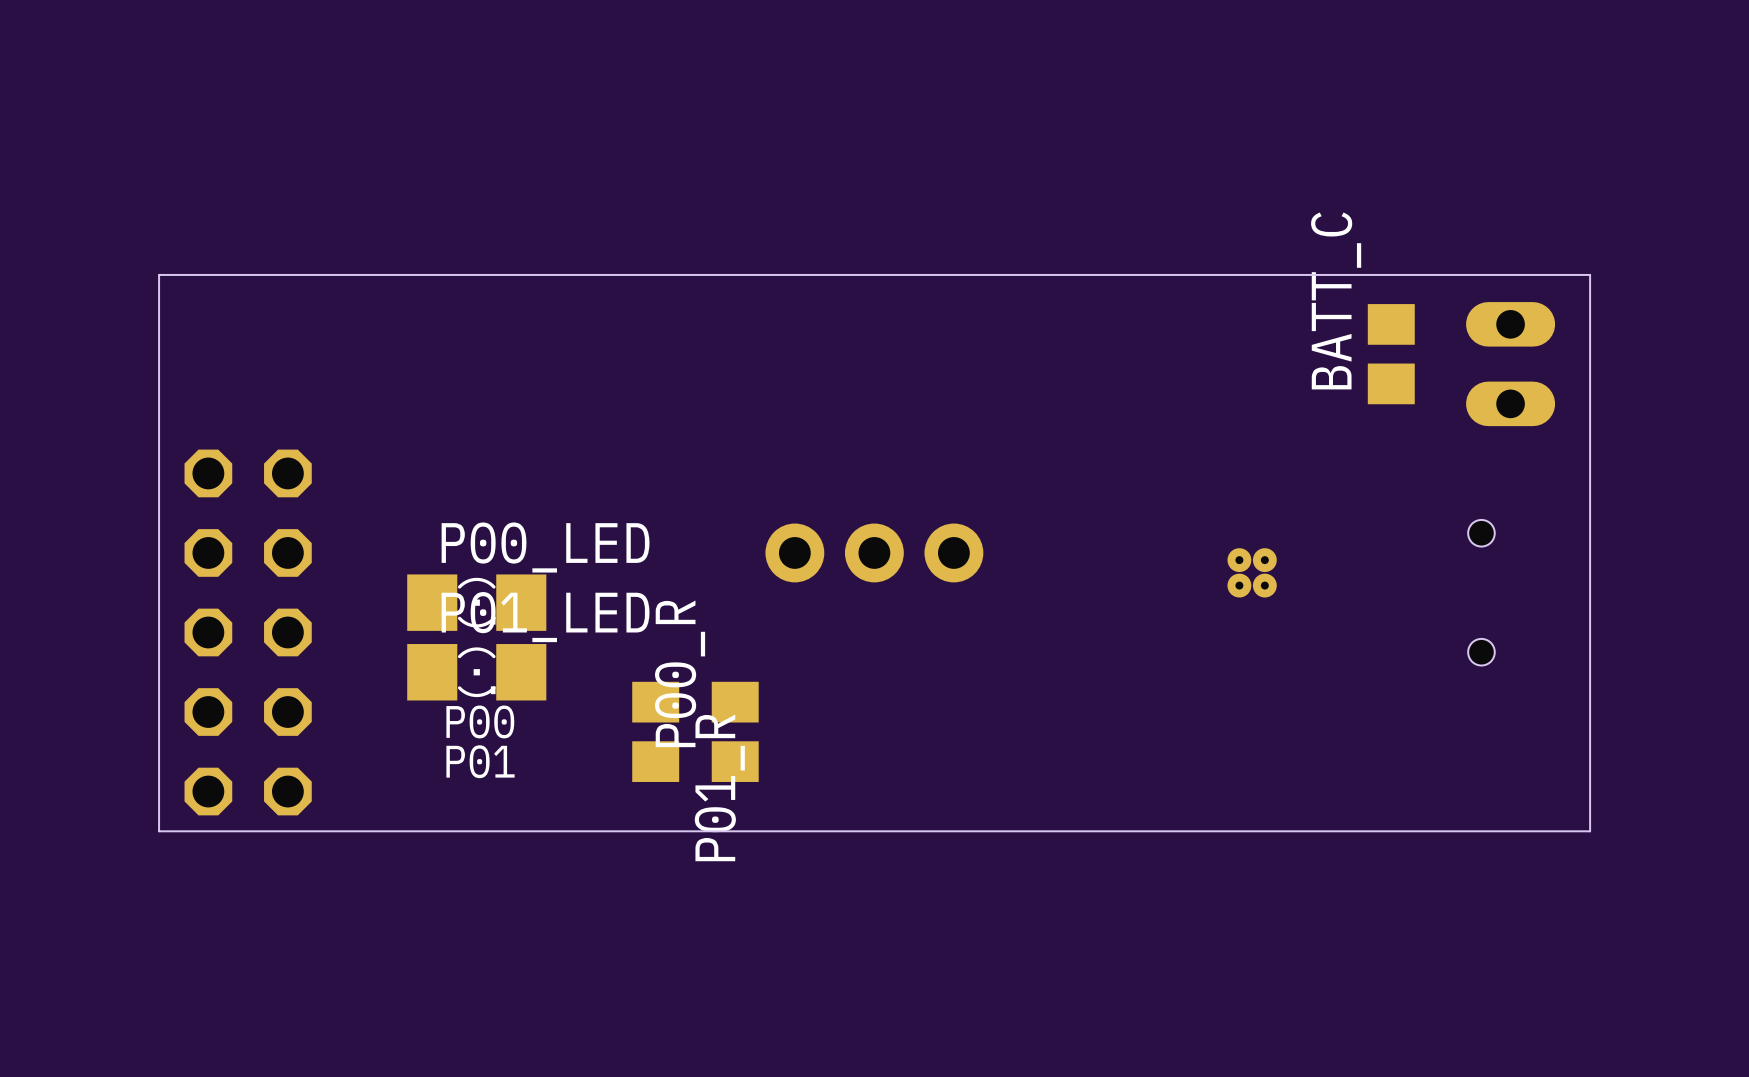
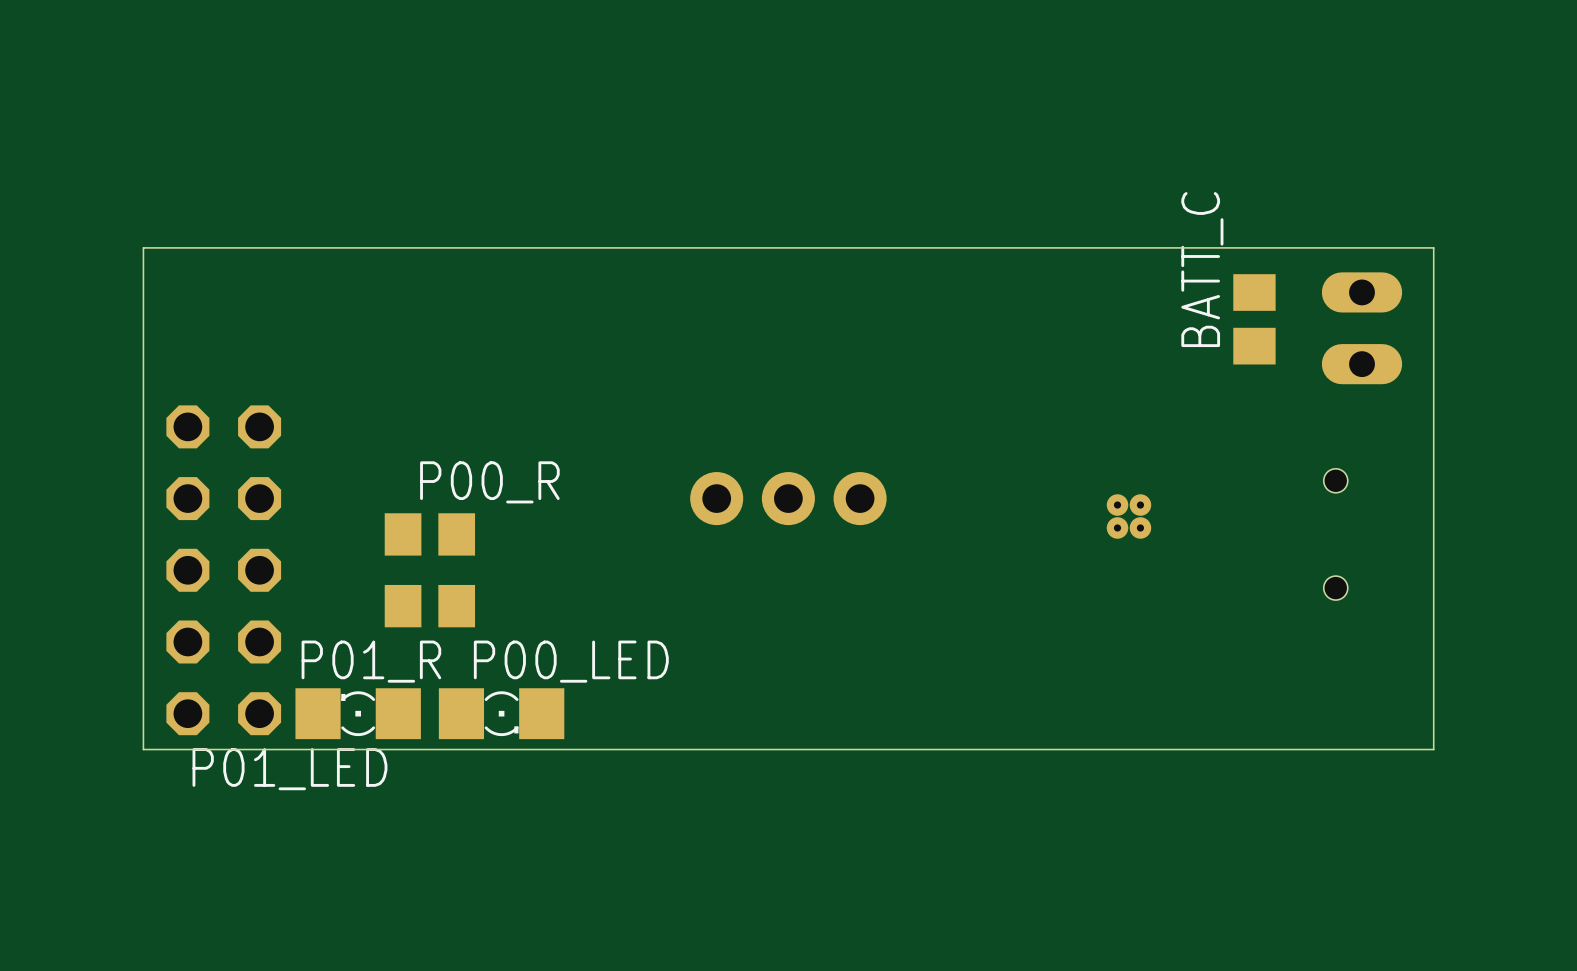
P00_LED position: (476, 602) -> (501, 713)
P01_LED rotation: 0° (476, 672) -> 180° (358, 713)
P01_LED position: (476, 672) -> (358, 713)
text: P00 (480, 721) -> none
P01_R rotation: 0° (655, 731) -> 90° clockwise (429, 606)
P01_R position: (655, 731) -> (429, 606)
P00_R rotation: 0° (735, 731) -> 90° clockwise (429, 534)
P00_R position: (735, 731) -> (429, 534)
text: P01 (480, 761) -> none

